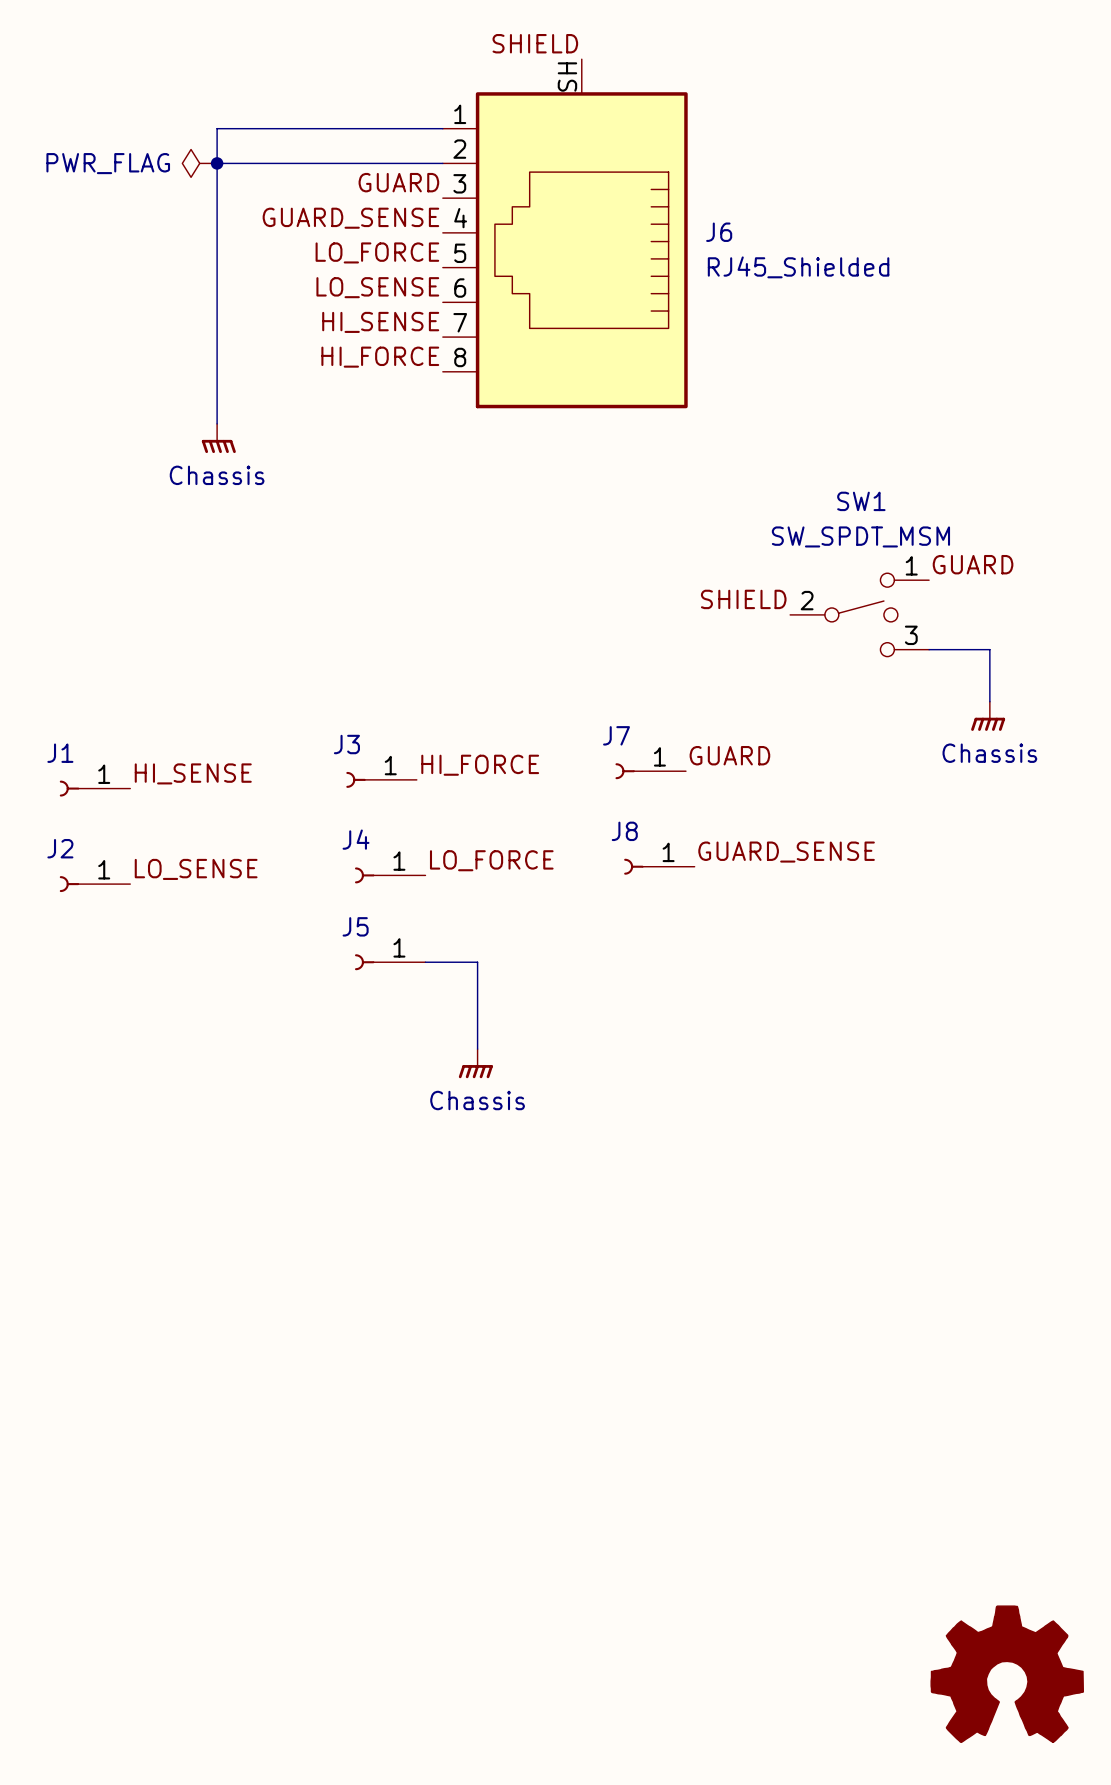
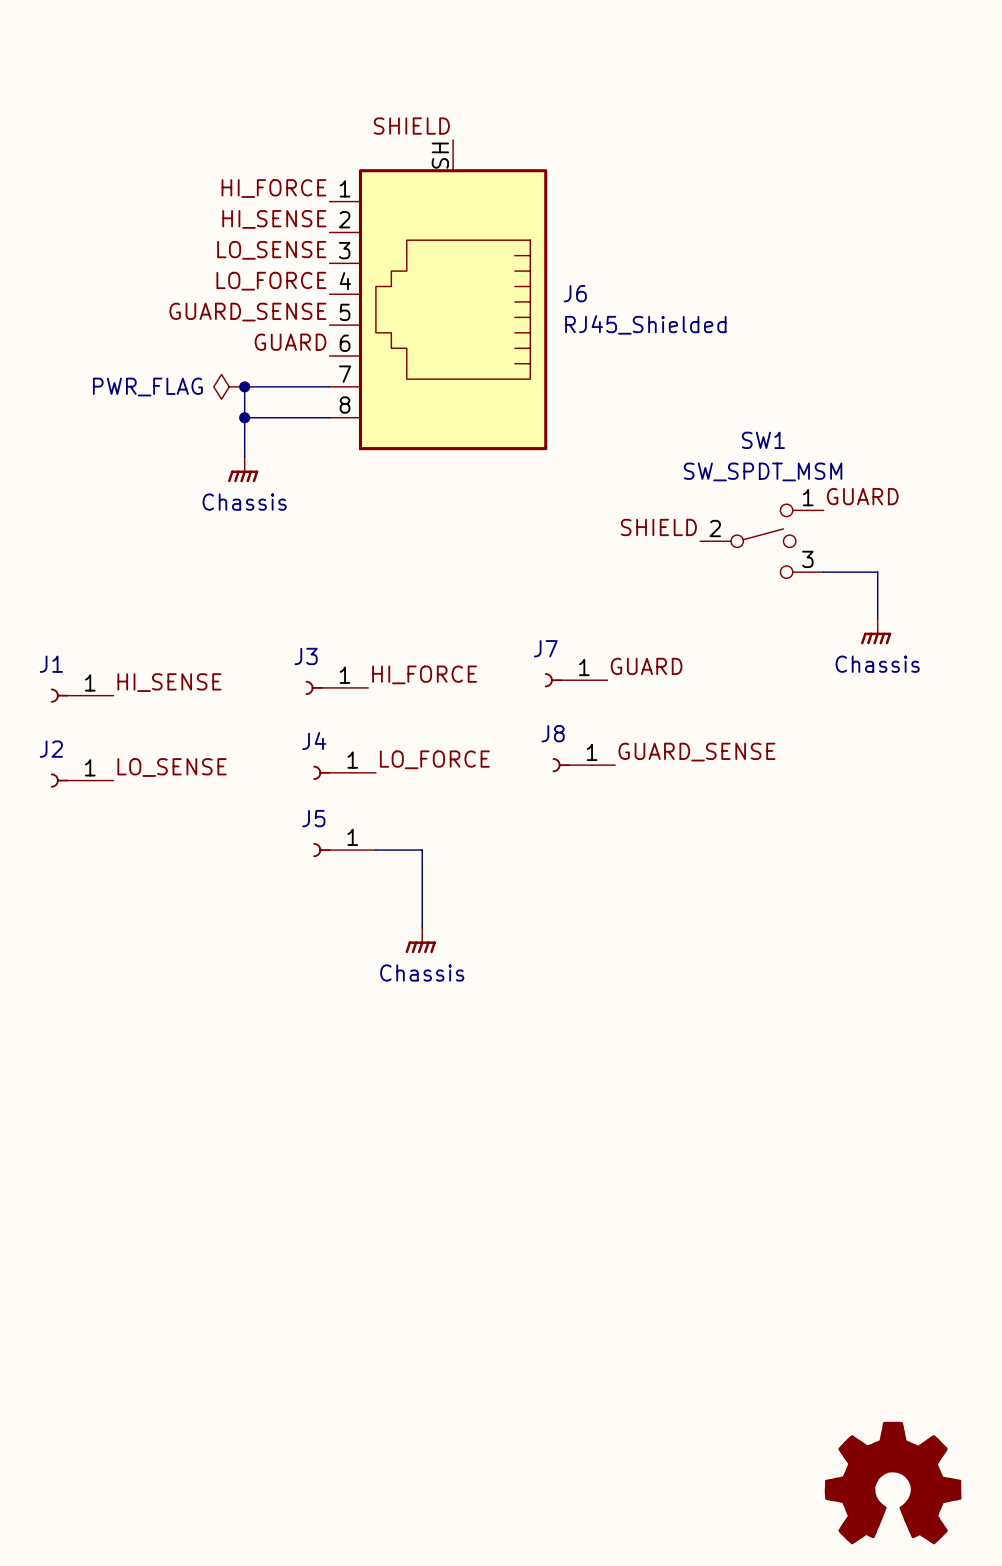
label position: SHIELD (535, 43) -> SHIELD (411, 126)
wire: (442, 128) (217, 128) (217, 423) -> none
power symbol position: PWR_FLAG (199, 163) -> PWR_FLAG (229, 386)
wire: (217, 163) (442, 163) -> none
junction: (217, 163) -> none
label position: GUARD (398, 182) -> GUARD (290, 342)
label position: GUARD_SENSE (350, 218) -> GUARD_SENSE (247, 312)
J6 position: (565, 233) -> (438, 295)
label position: LO_FORCE (377, 252) -> LO_FORCE (271, 281)
label position: LO_SENSE (377, 287) -> LO_SENSE (271, 250)
label position: HI_SENSE (380, 322) -> HI_SENSE (274, 219)
label position: HI_FORCE (380, 357) -> HI_FORCE (273, 188)
power symbol: (218, 438) -> none
junction: none -> (244, 386)
wire: none -> (329, 386) (244, 386) (244, 456)
wire: none -> (244, 417) (329, 417)
junction: none -> (244, 417)
power symbol: none -> (243, 469)

